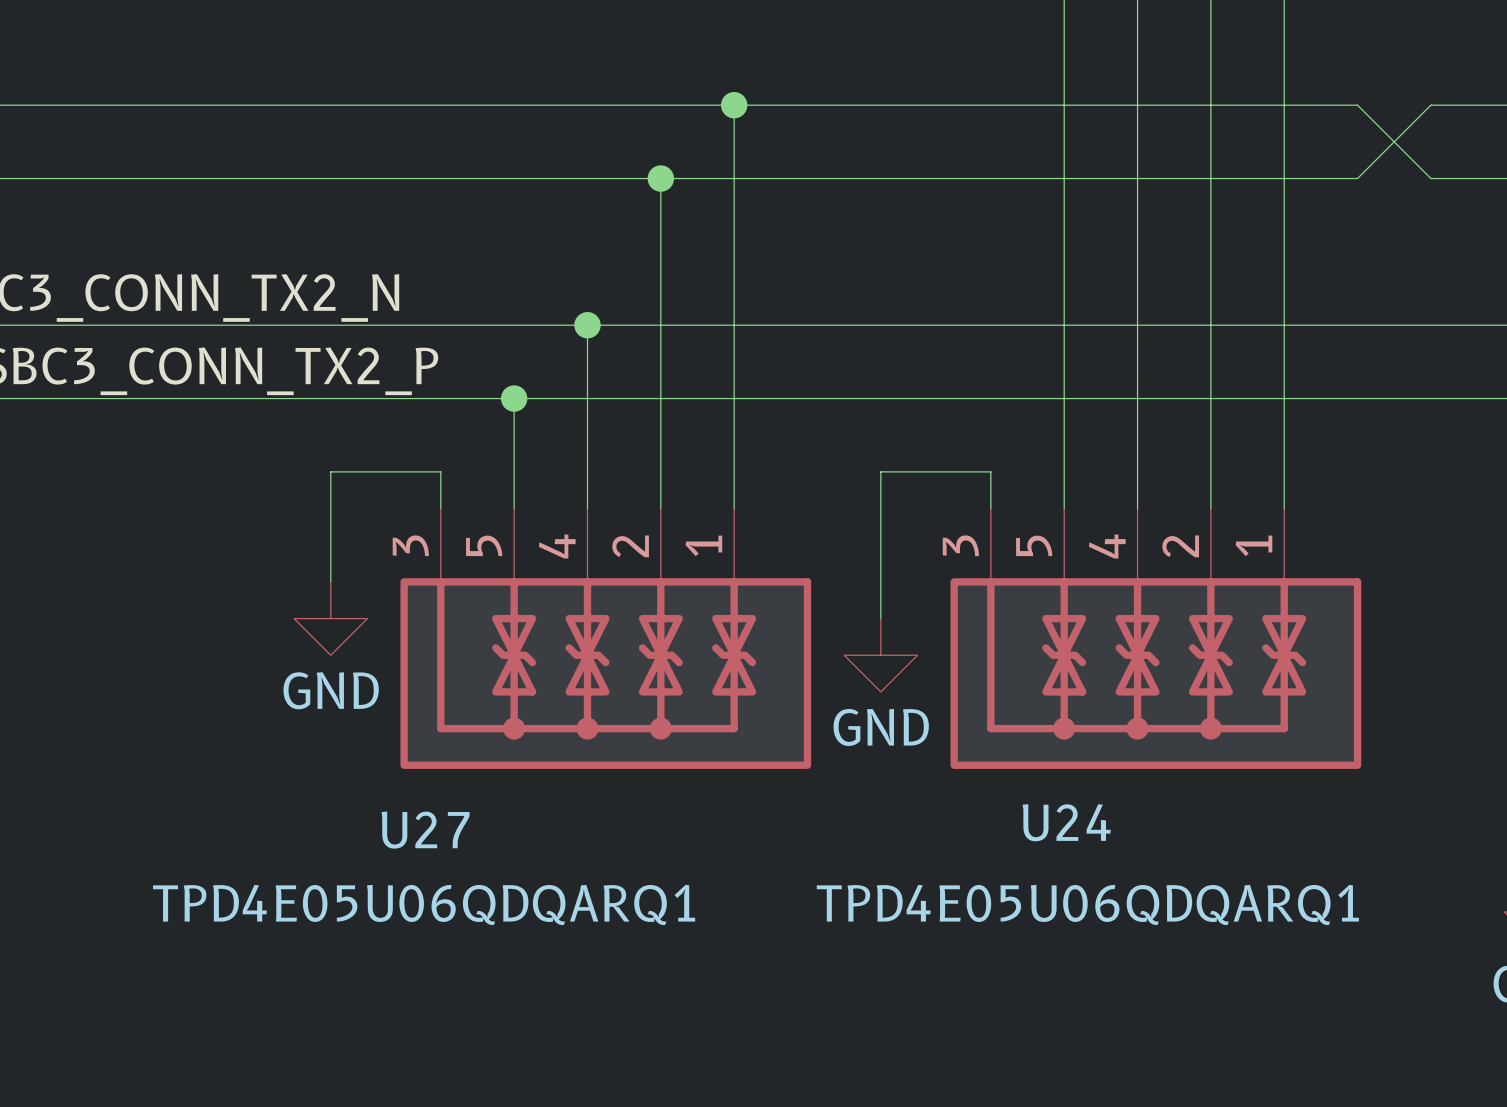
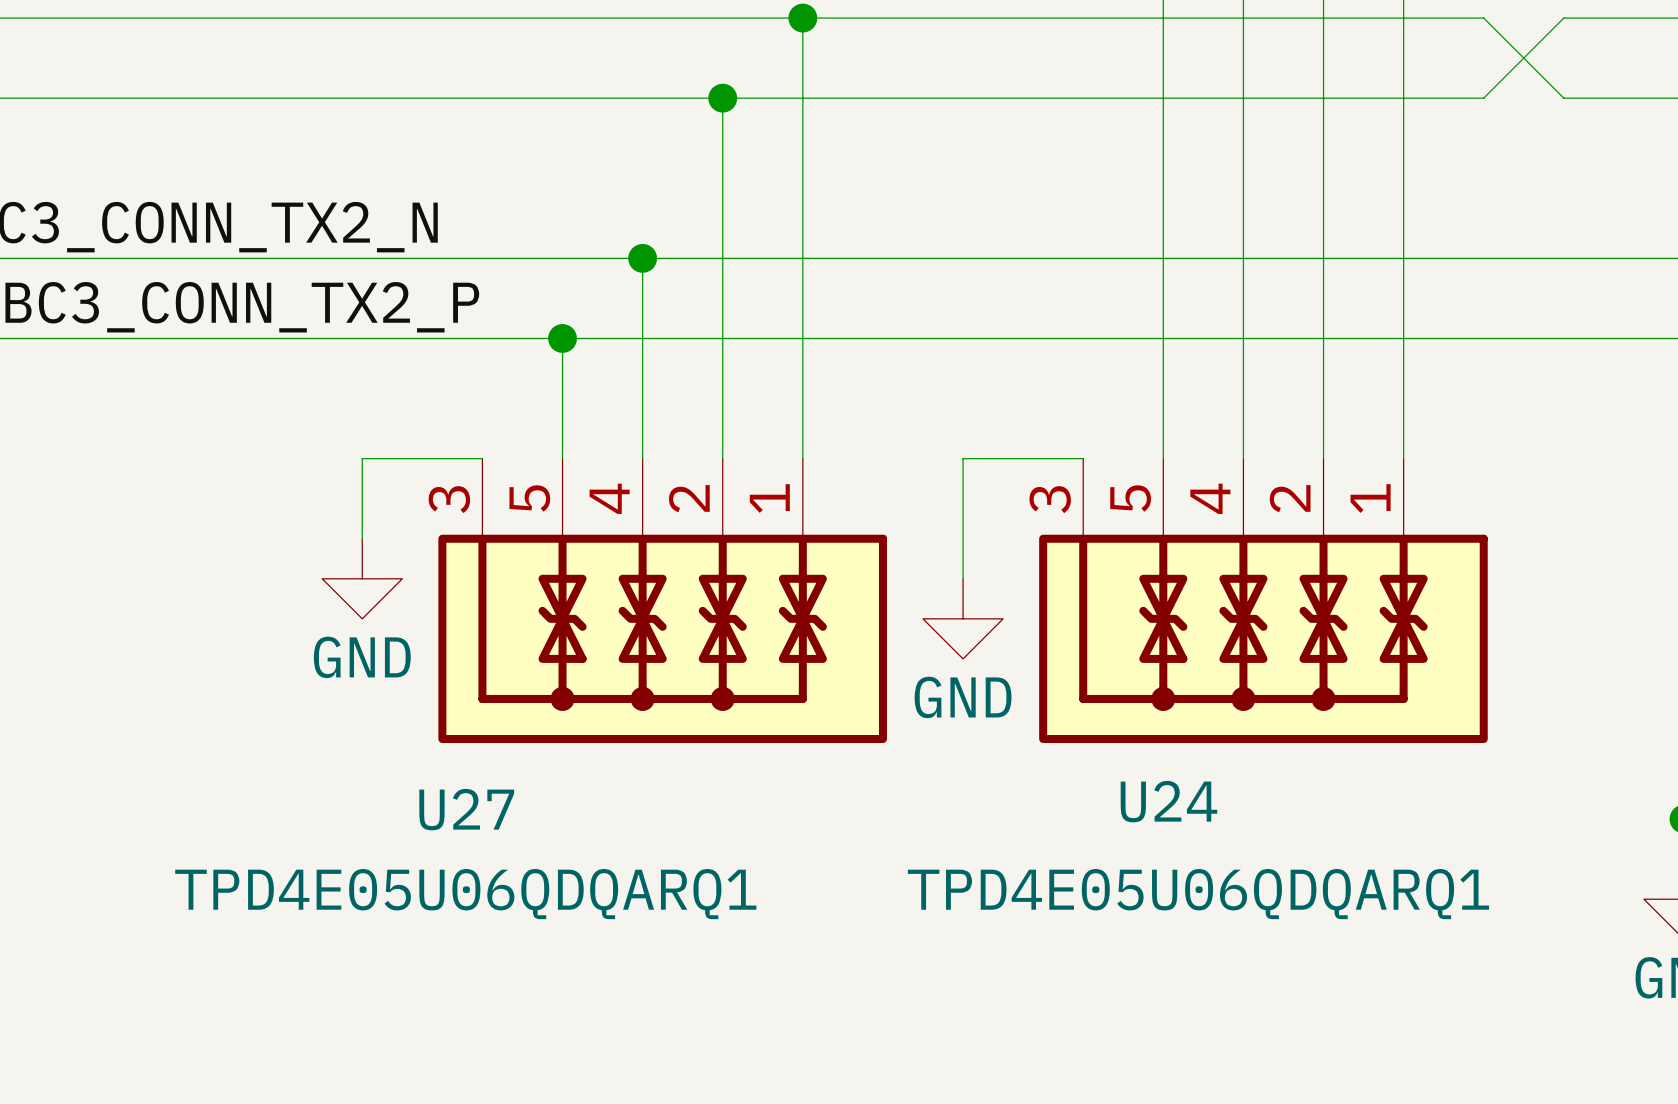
wire: (330, 508) (330, 471) (440, 471) (440, 508) -> (362, 458) (482, 458)
wire: (880, 508) (880, 471) (990, 471) (990, 508) -> (963, 458) (1083, 458)

